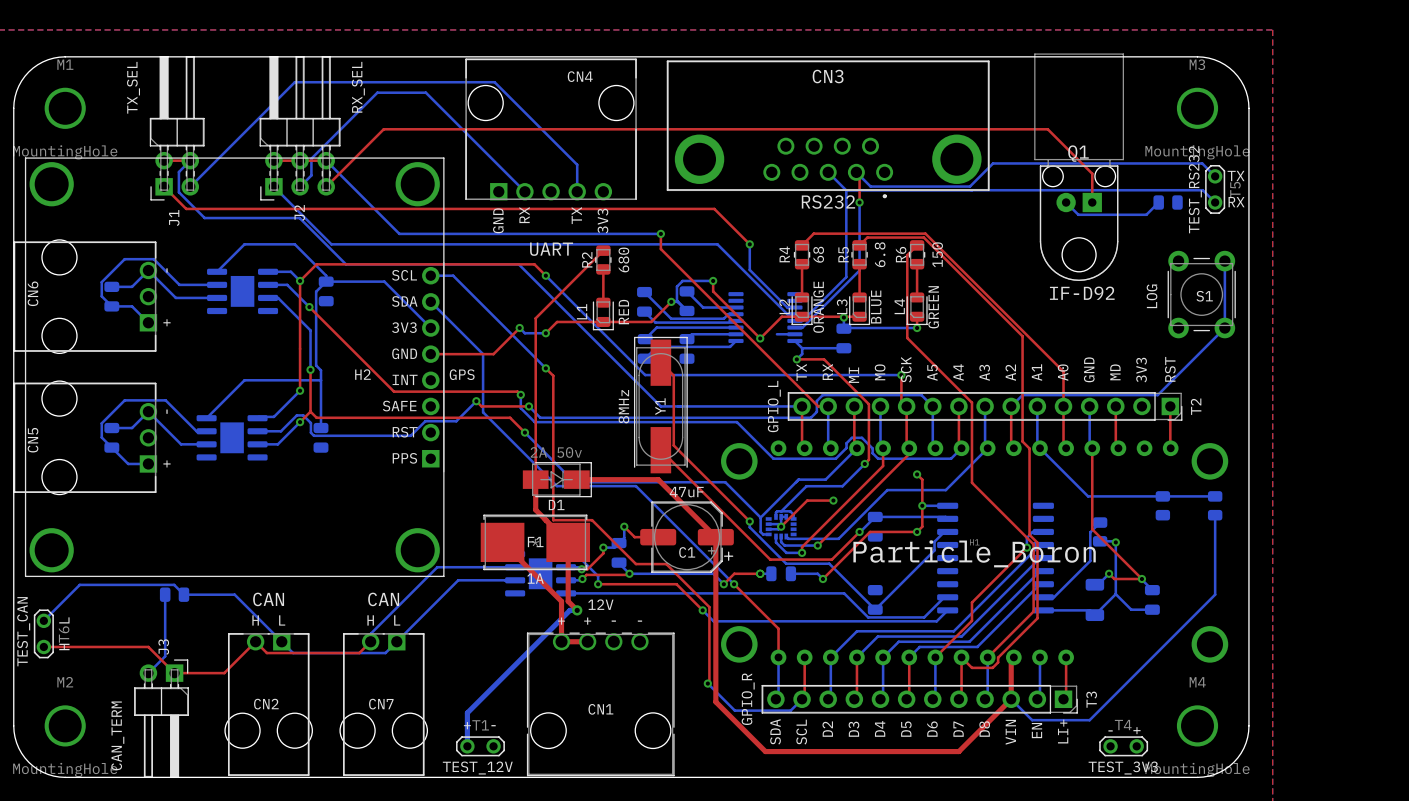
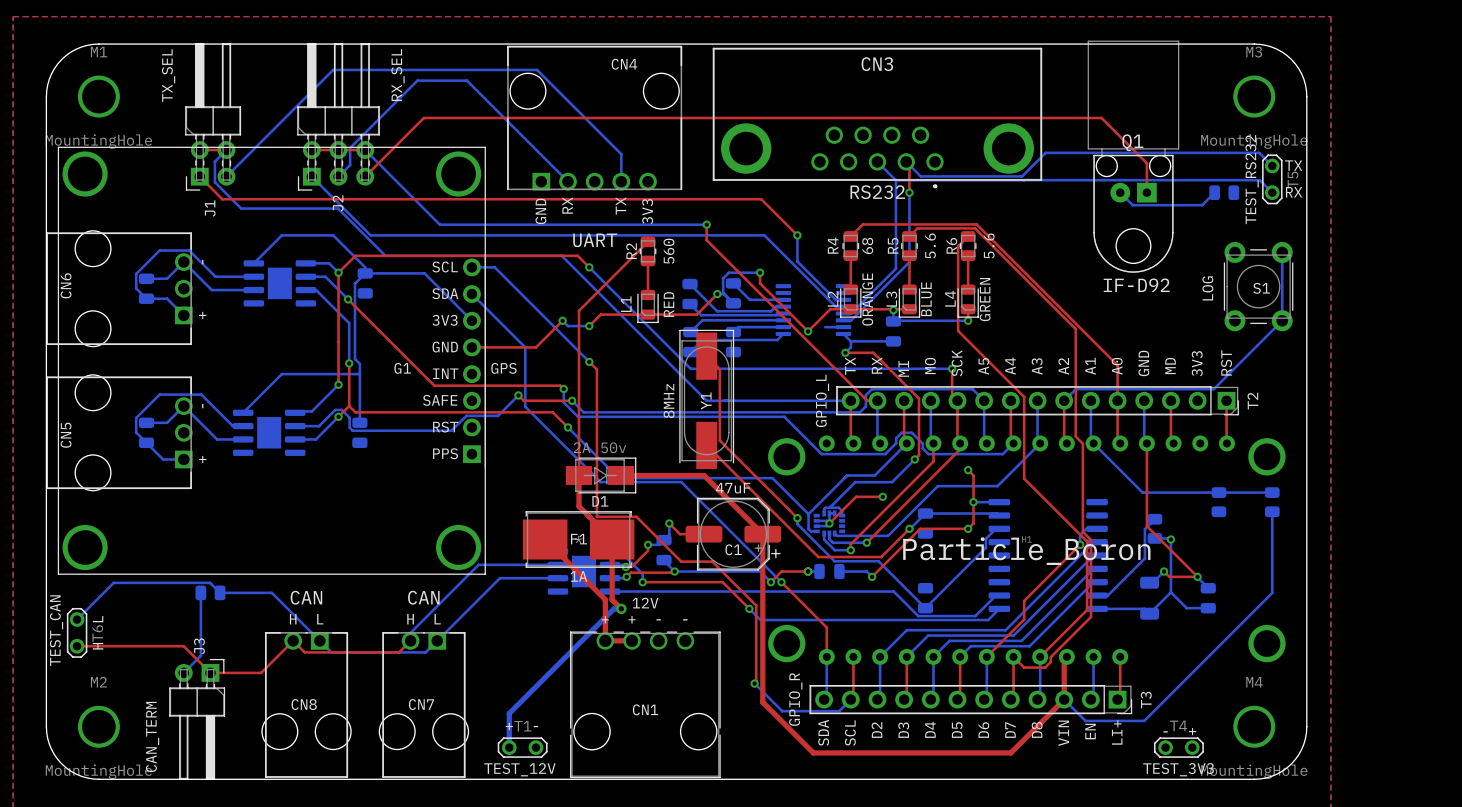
R5 value: 6.8 (880, 254) -> 5.6 (930, 245)
R6 value: 150 (937, 254) -> 5.6 (989, 245)
R2 value: 680 (623, 259) -> 560 (668, 251)
H2 name: H2 (362, 374) -> G1 (402, 368)
CN2 name: CN2 (266, 704) -> CN8 (304, 704)

